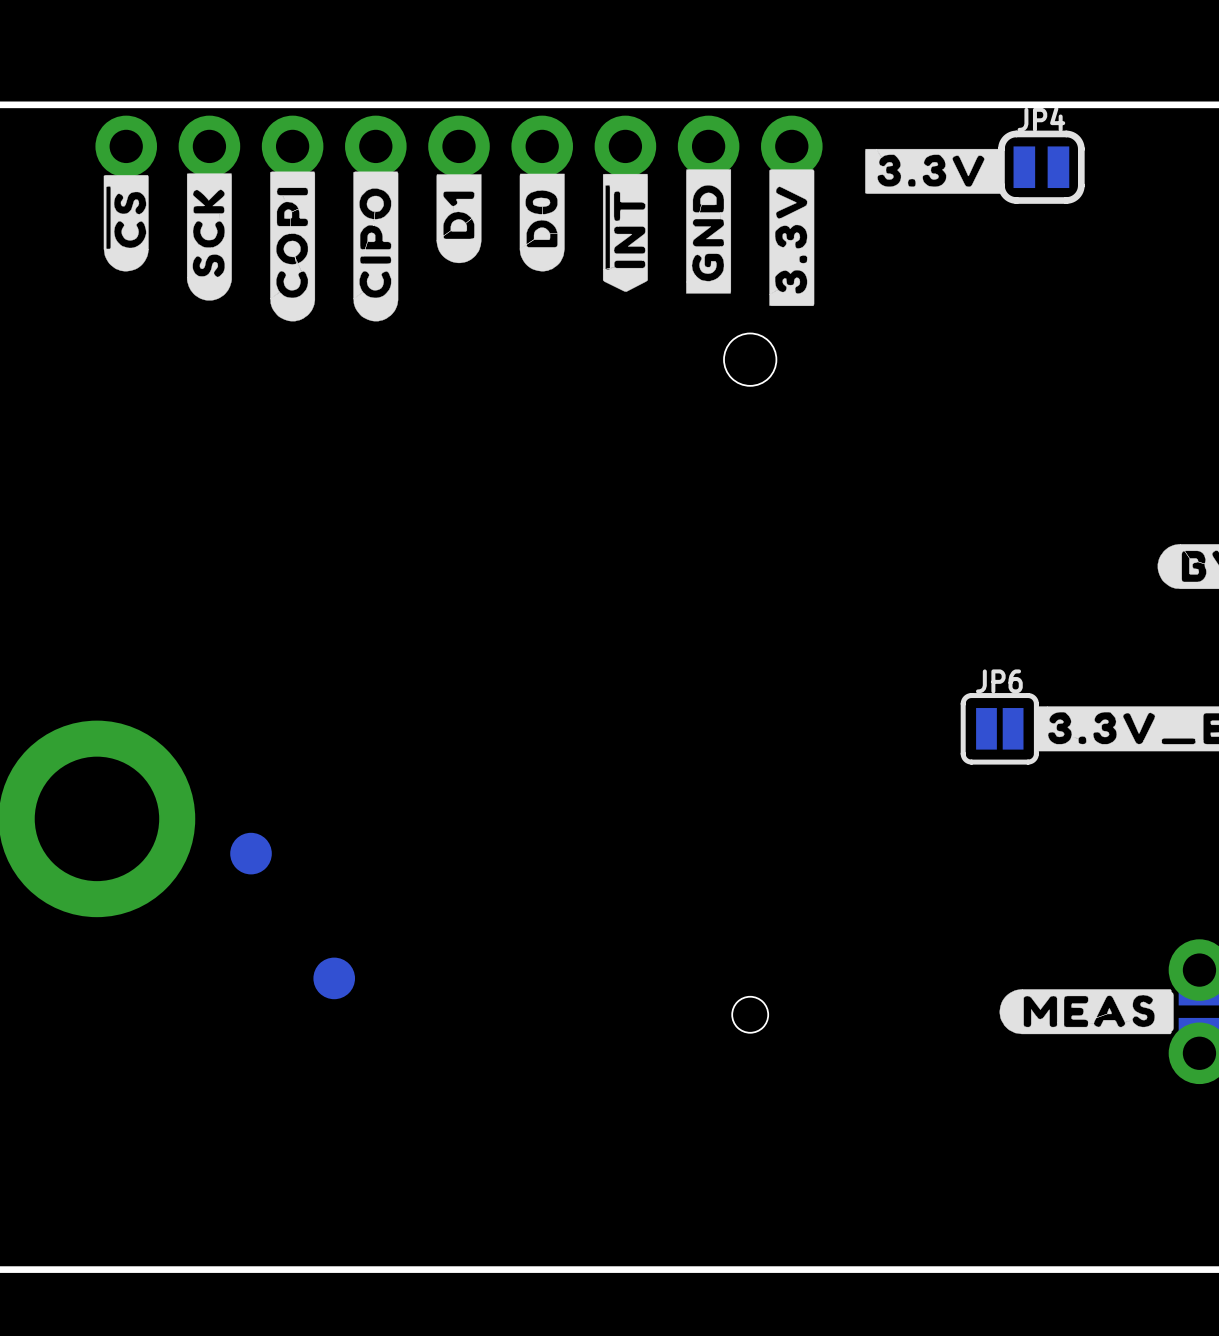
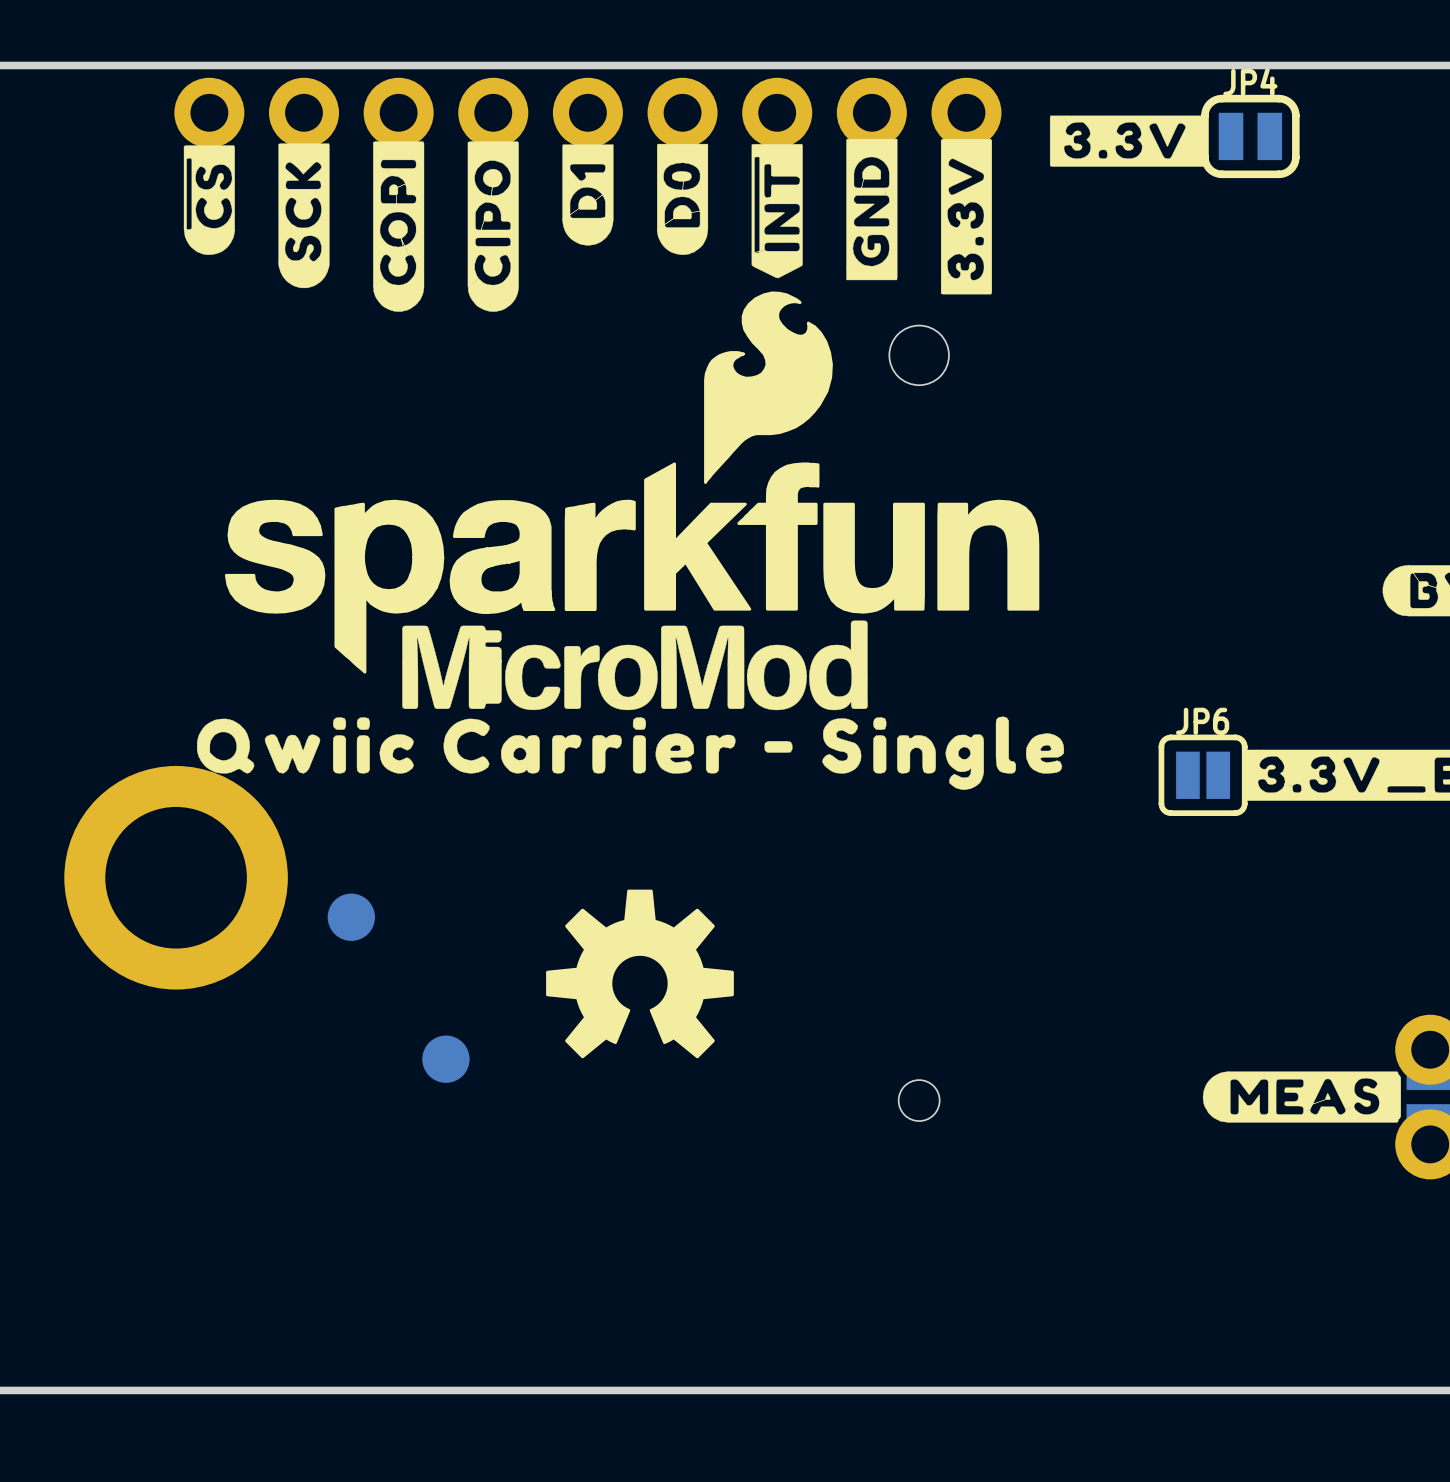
drawing: none -> [196, 291, 1065, 790]
drawing: none -> [546, 889, 734, 1059]

